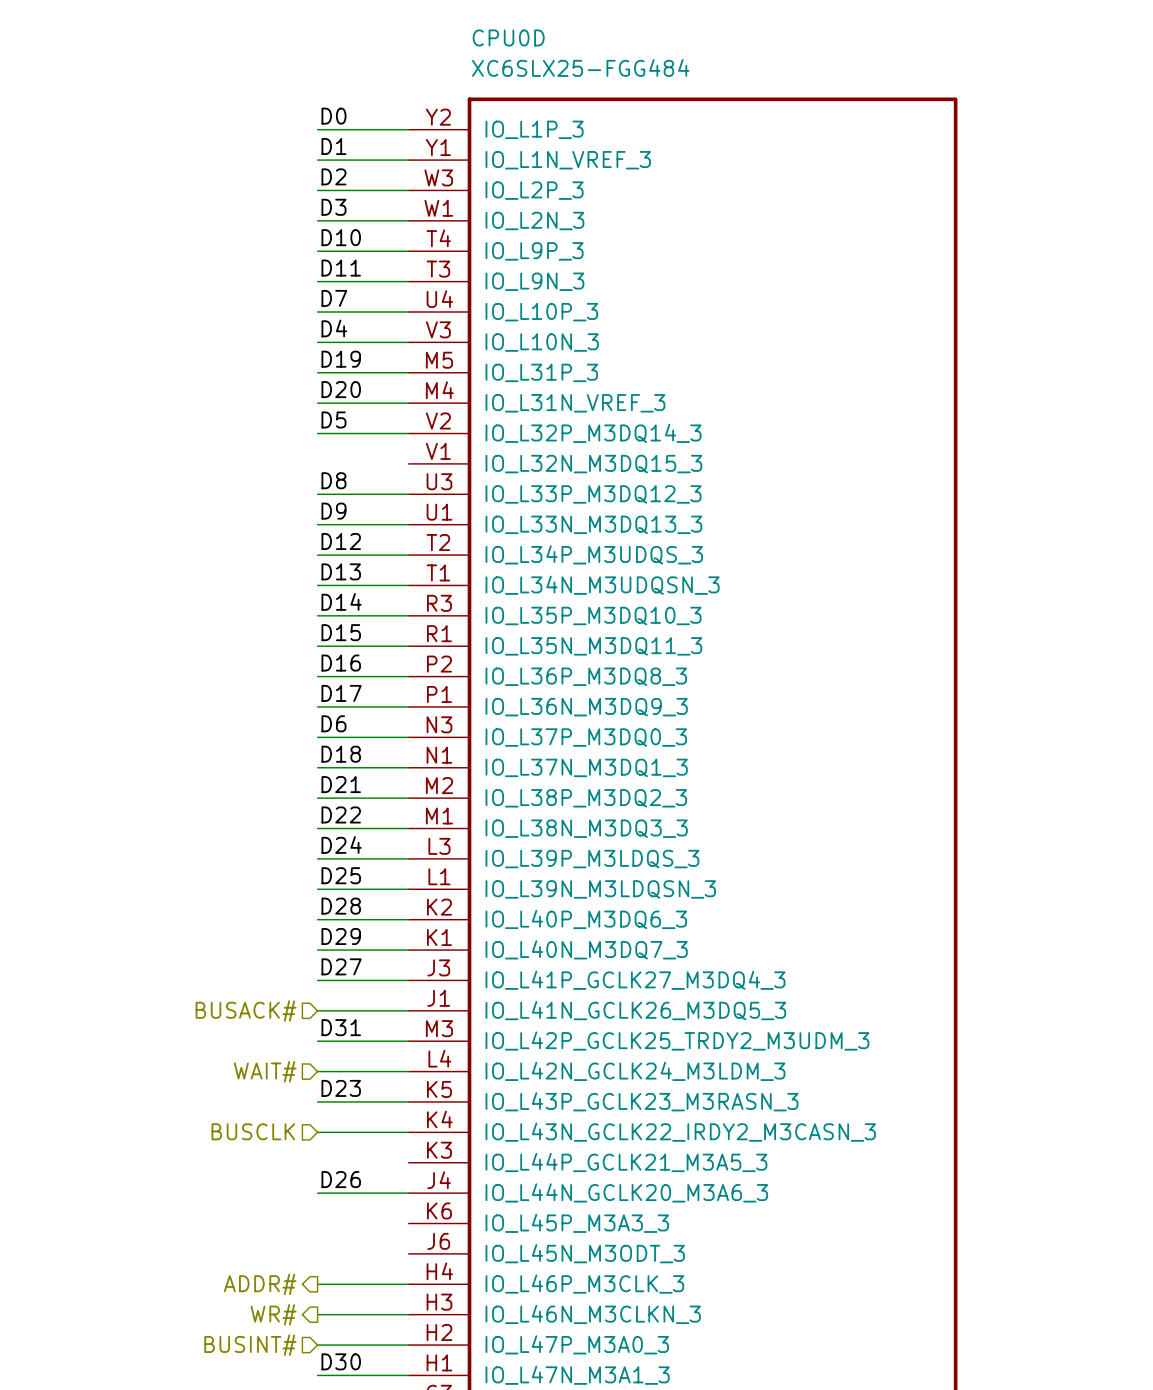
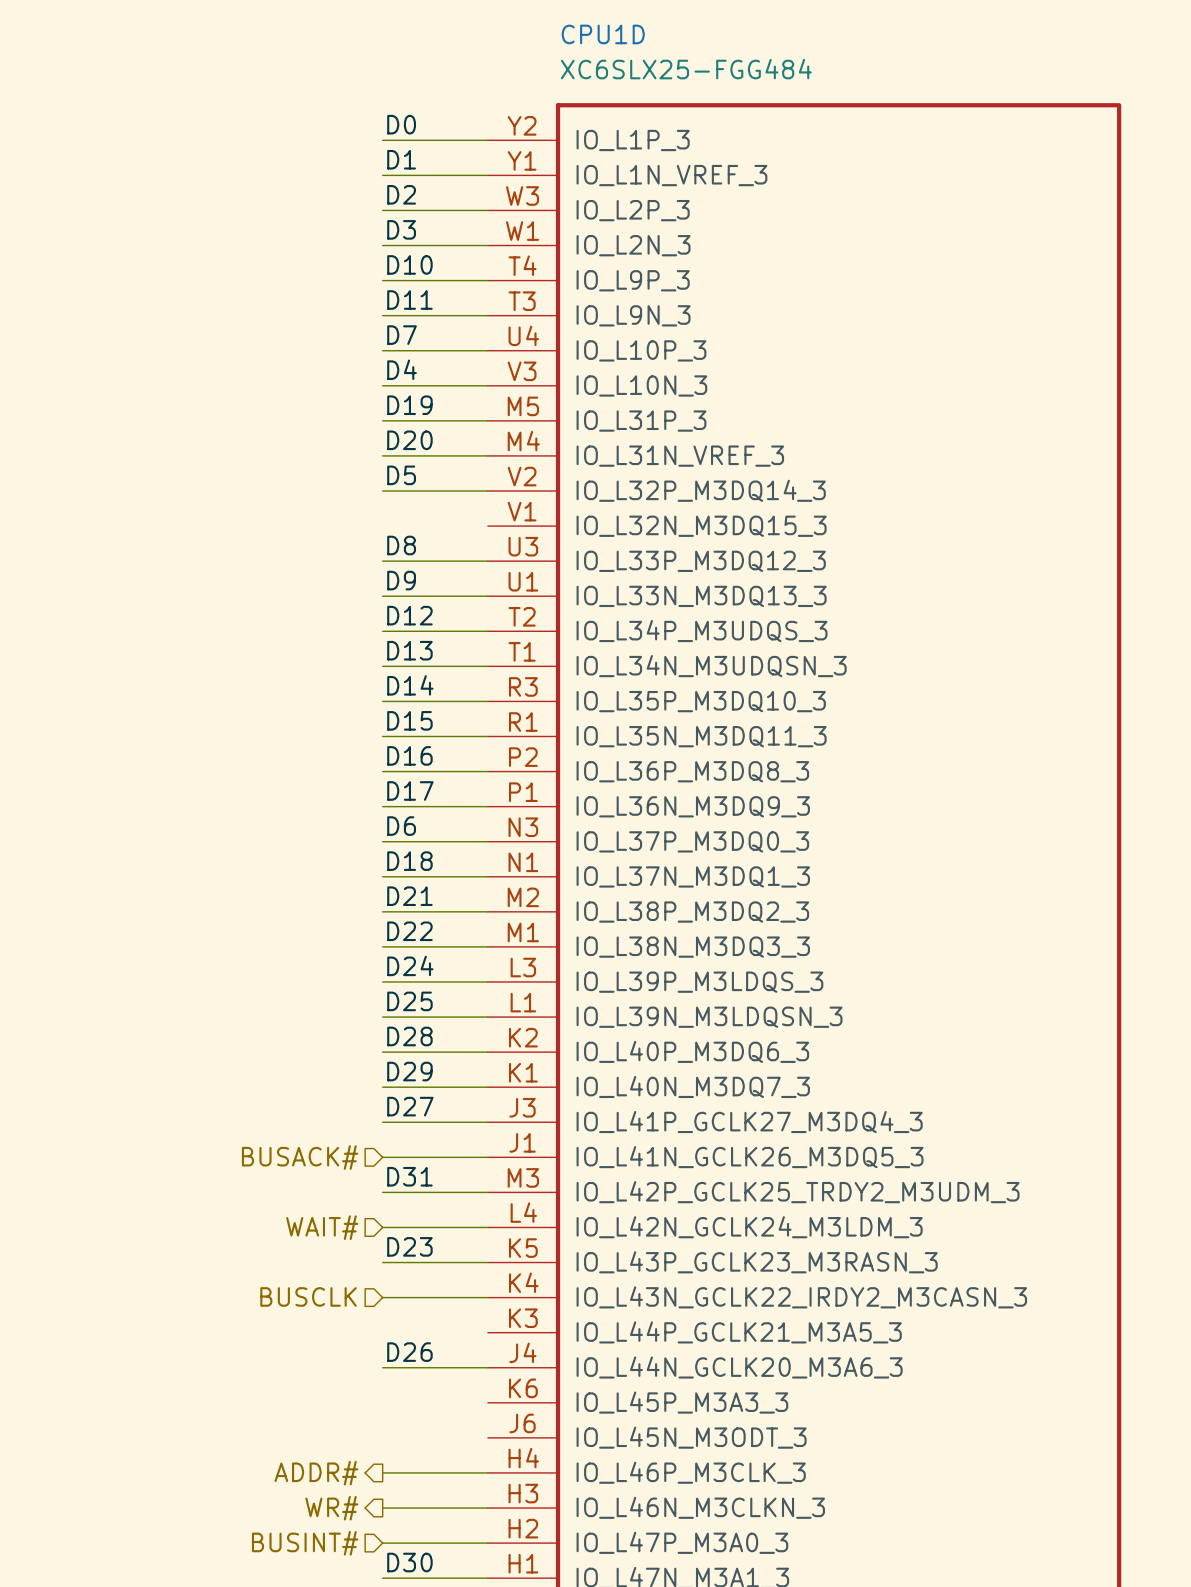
CPU0D name: CPU0D (508, 37) -> CPU1D (603, 34)

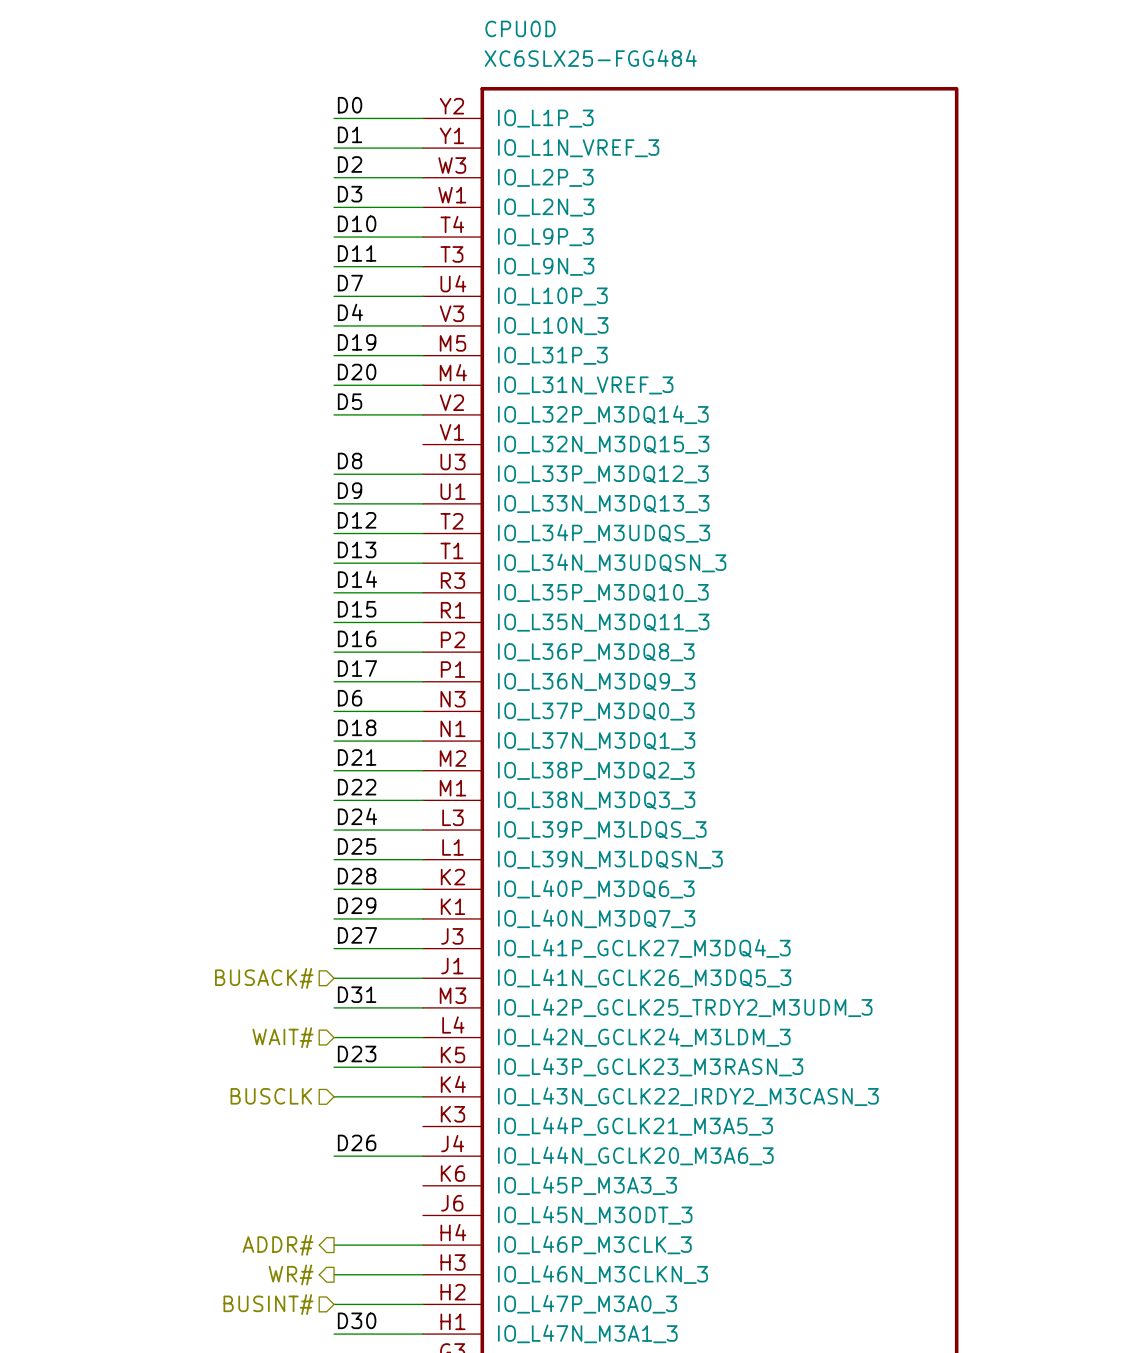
CPU1D name: CPU1D (603, 34) -> CPU0D (520, 28)

